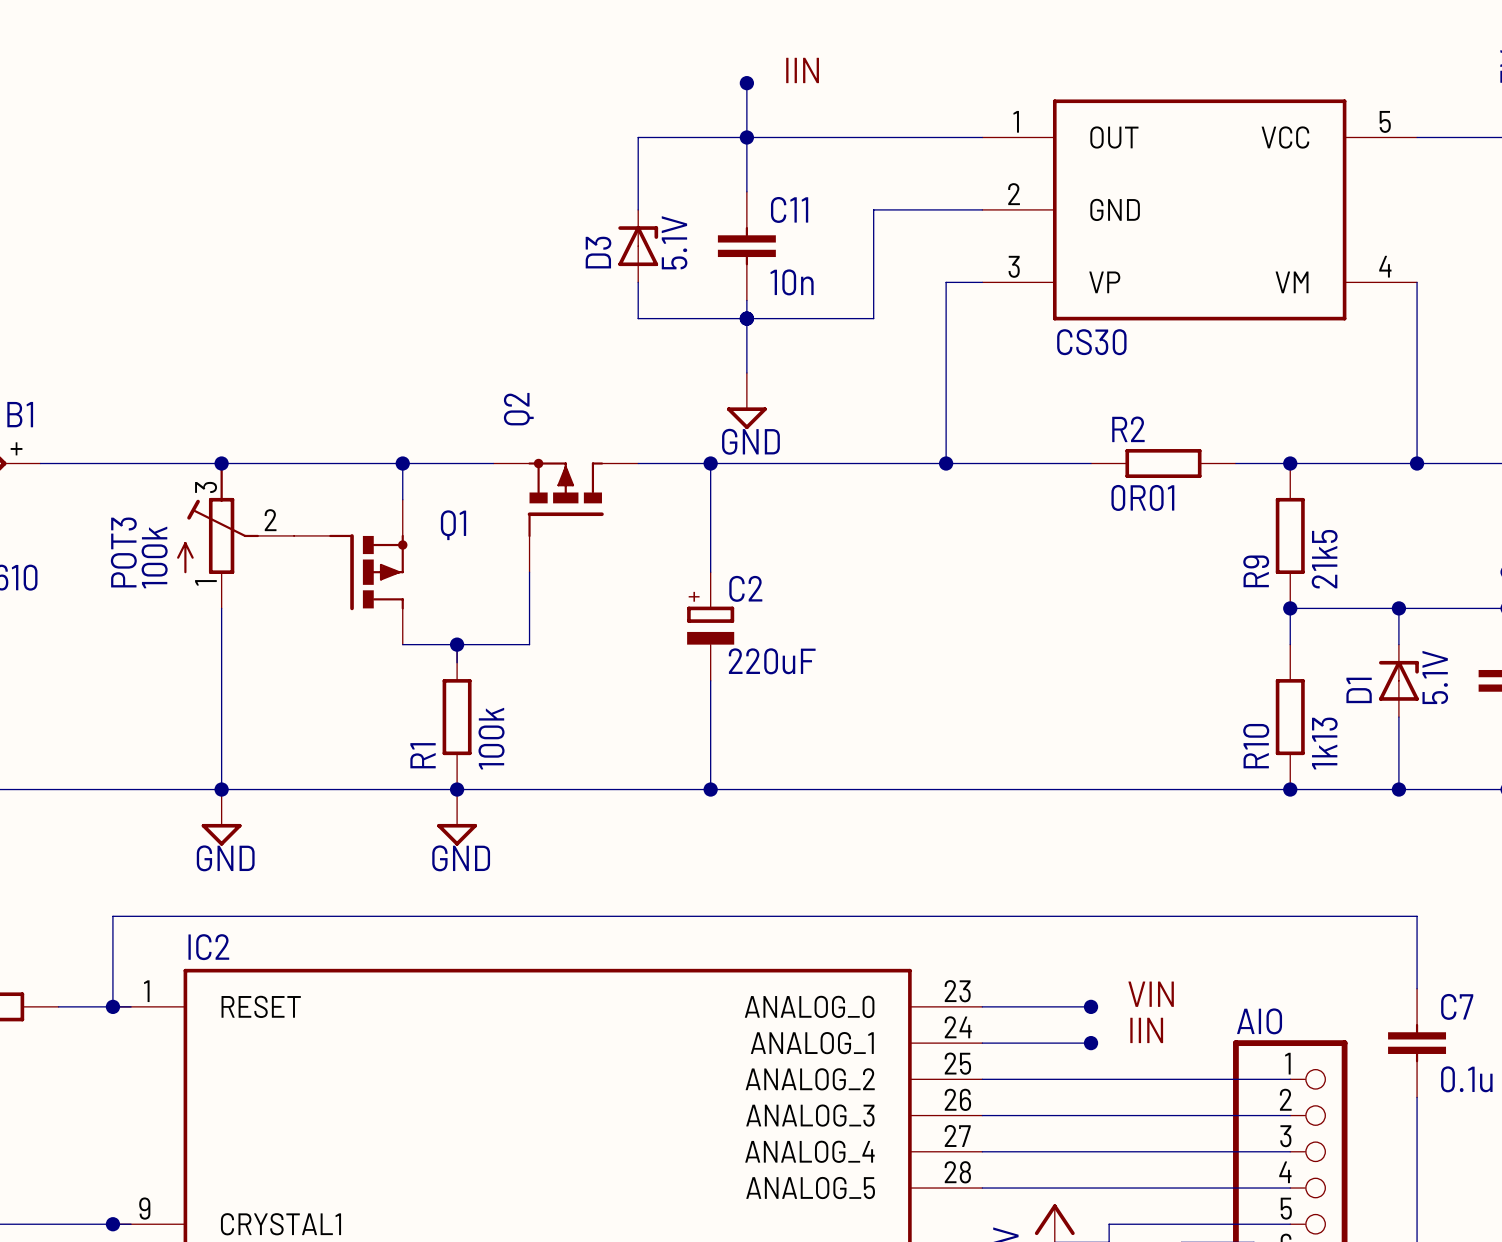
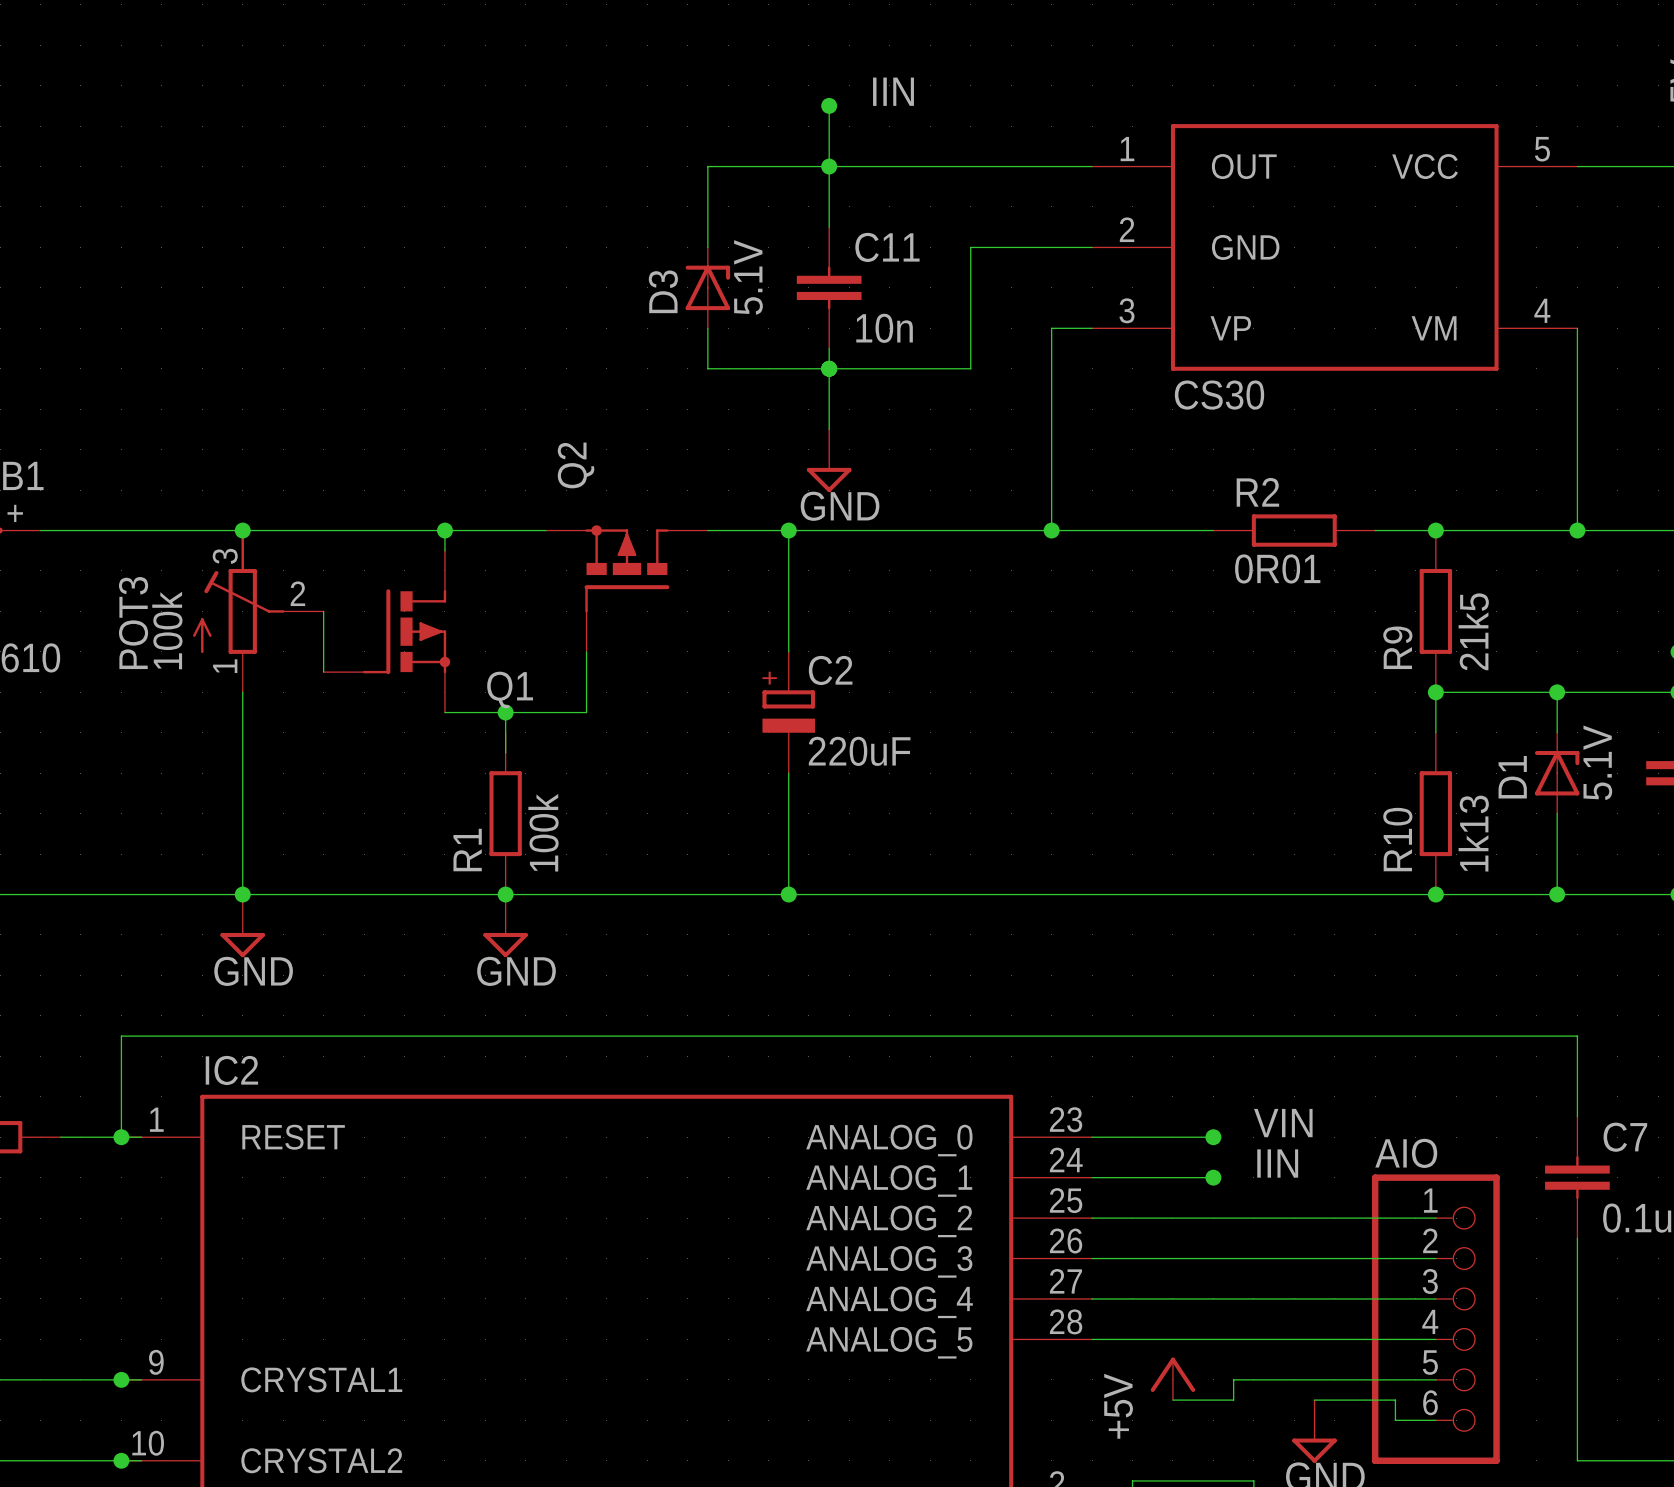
wire: none -> (323, 611) (323, 672)
Q1 flip: as is (368, 572) -> up-down (406, 631)
wire: (529, 626) (529, 644) (402, 644) -> (586, 712) (444, 712)
junction position: (457, 644) -> (505, 712)

